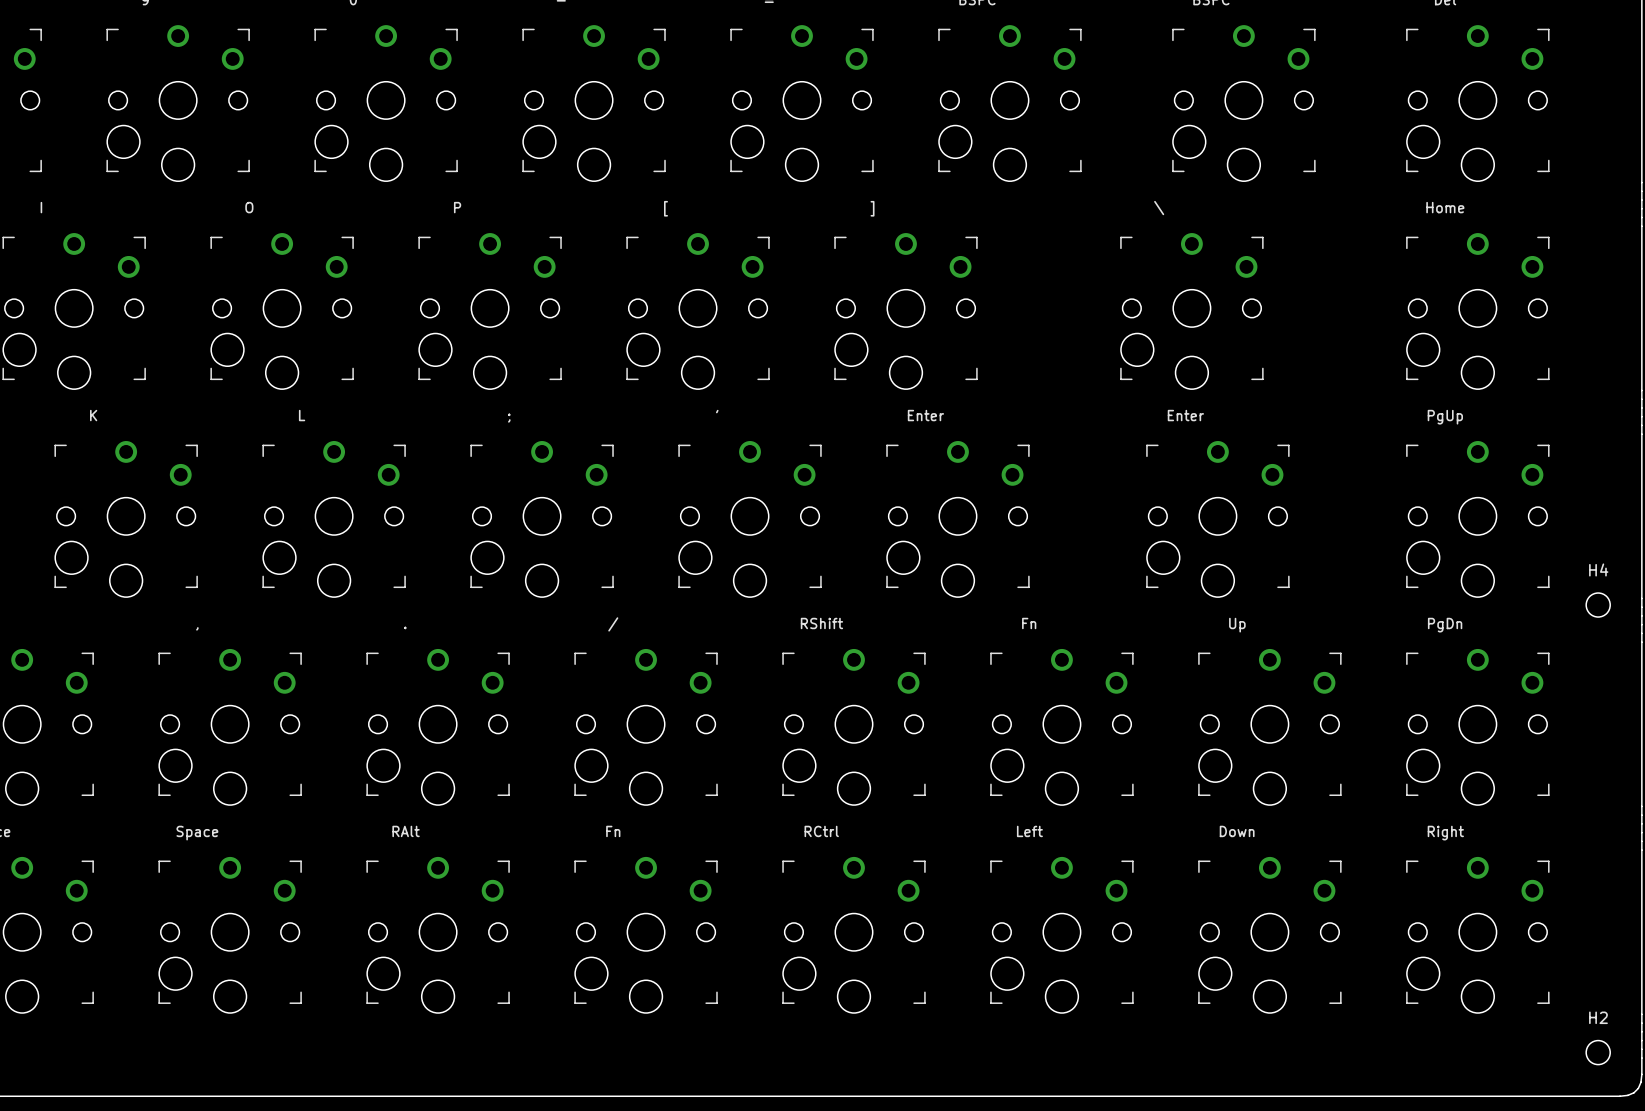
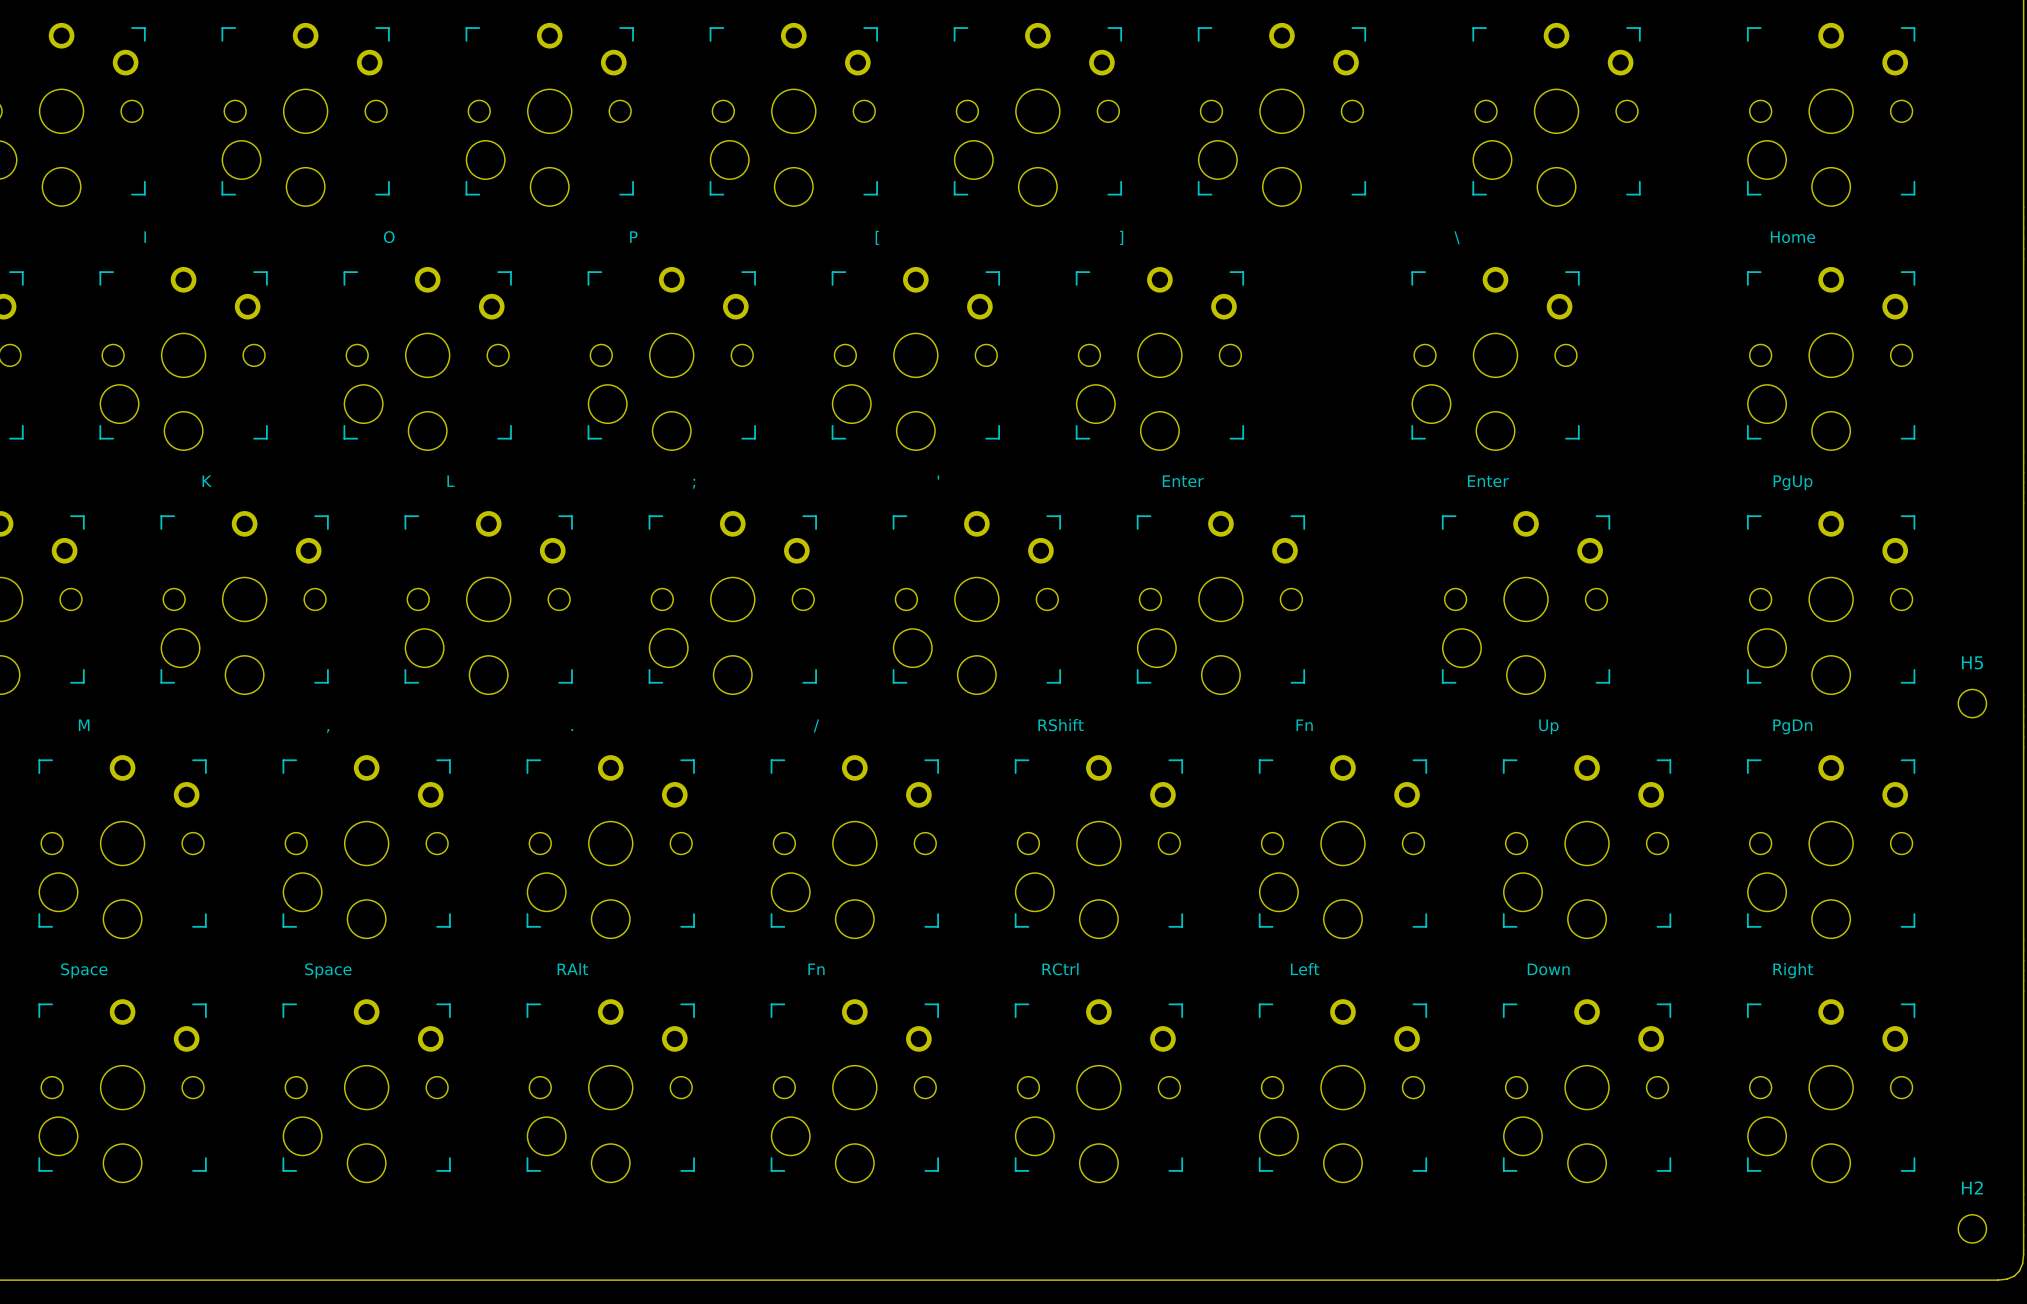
H4 name: H4 (1598, 569) -> H5 (1972, 662)

